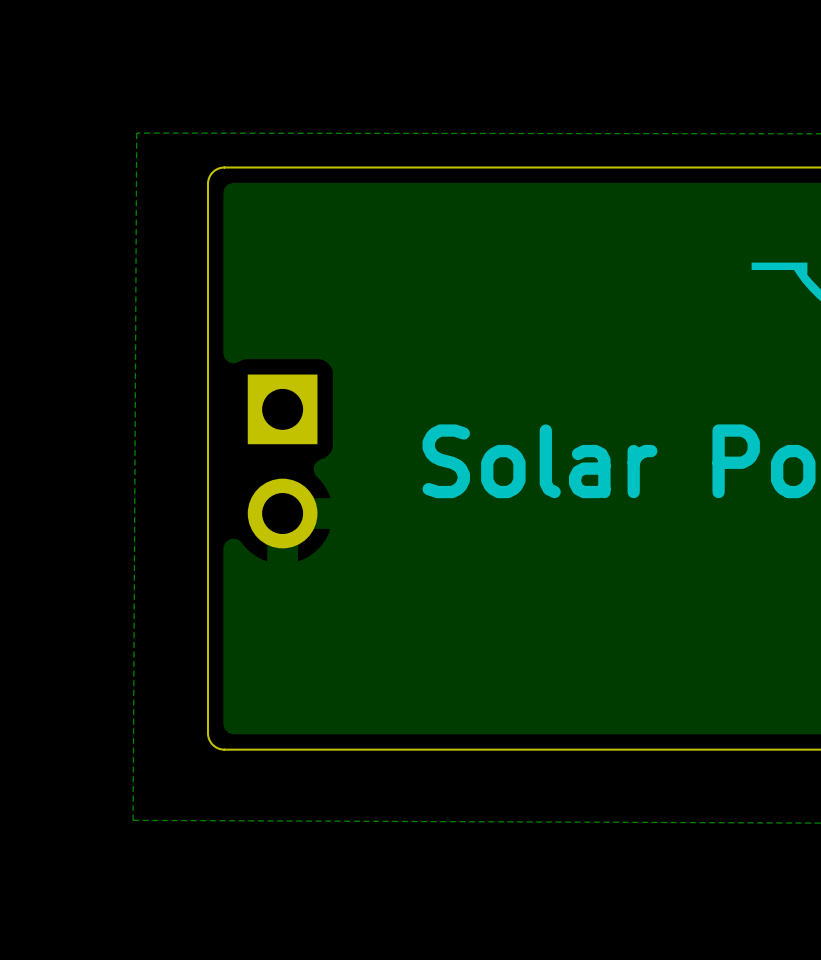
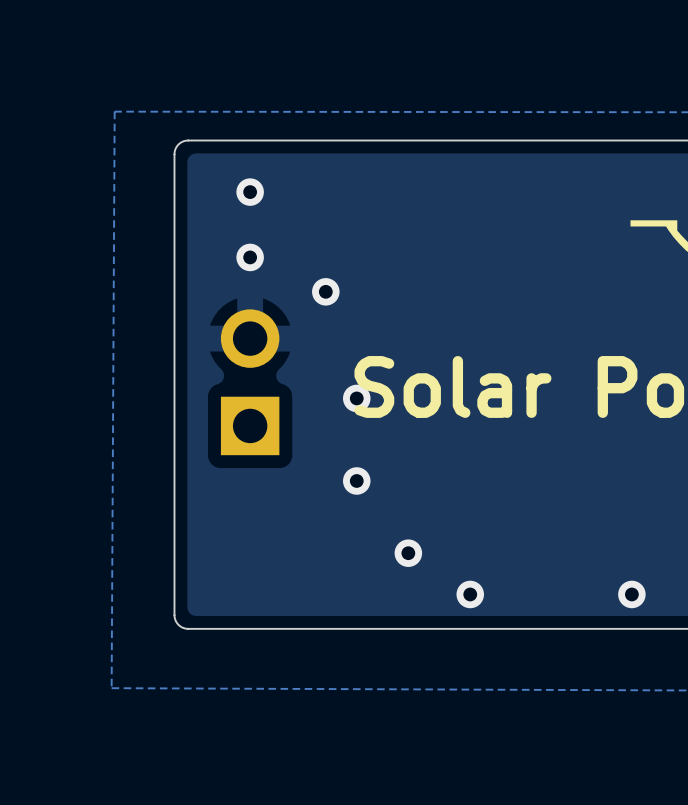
via: none -> (250, 192)
via: none -> (250, 257)
via: none -> (325, 291)
part rotation: 0° (282, 461) -> 180° (250, 382)
via: none -> (356, 398)
via: none -> (356, 480)
via: none -> (408, 553)
via: none -> (470, 594)
via: none -> (631, 594)

